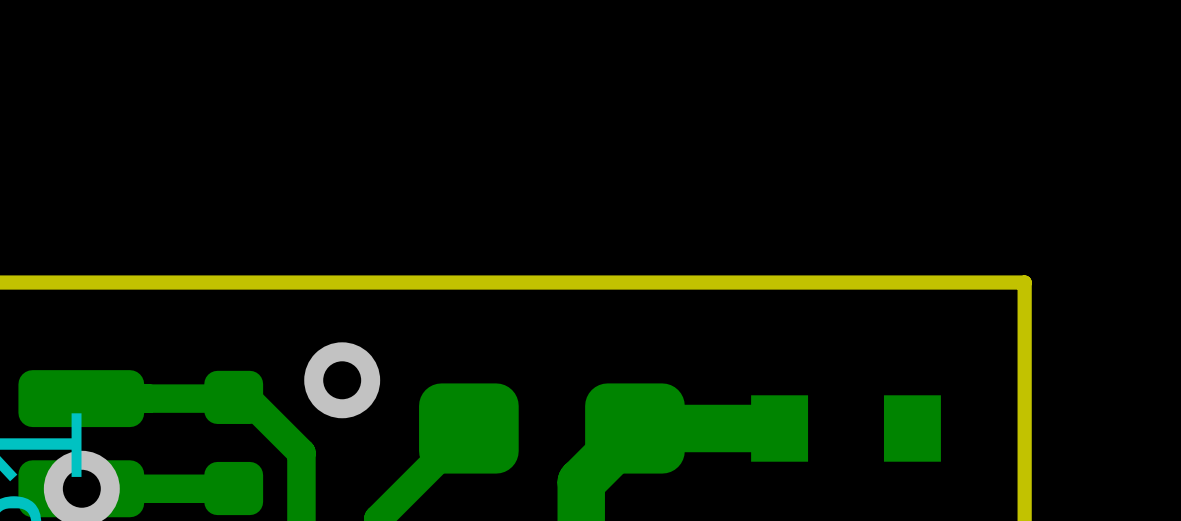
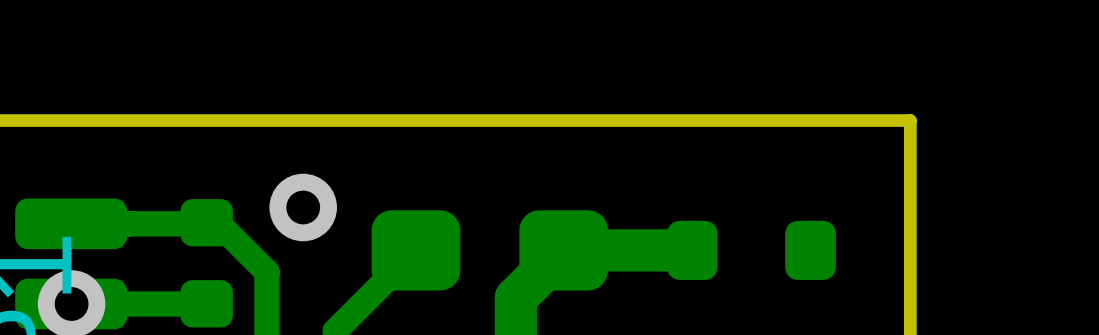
part footprint: [751, 395, 941, 462] -> [667, 220, 836, 280]

